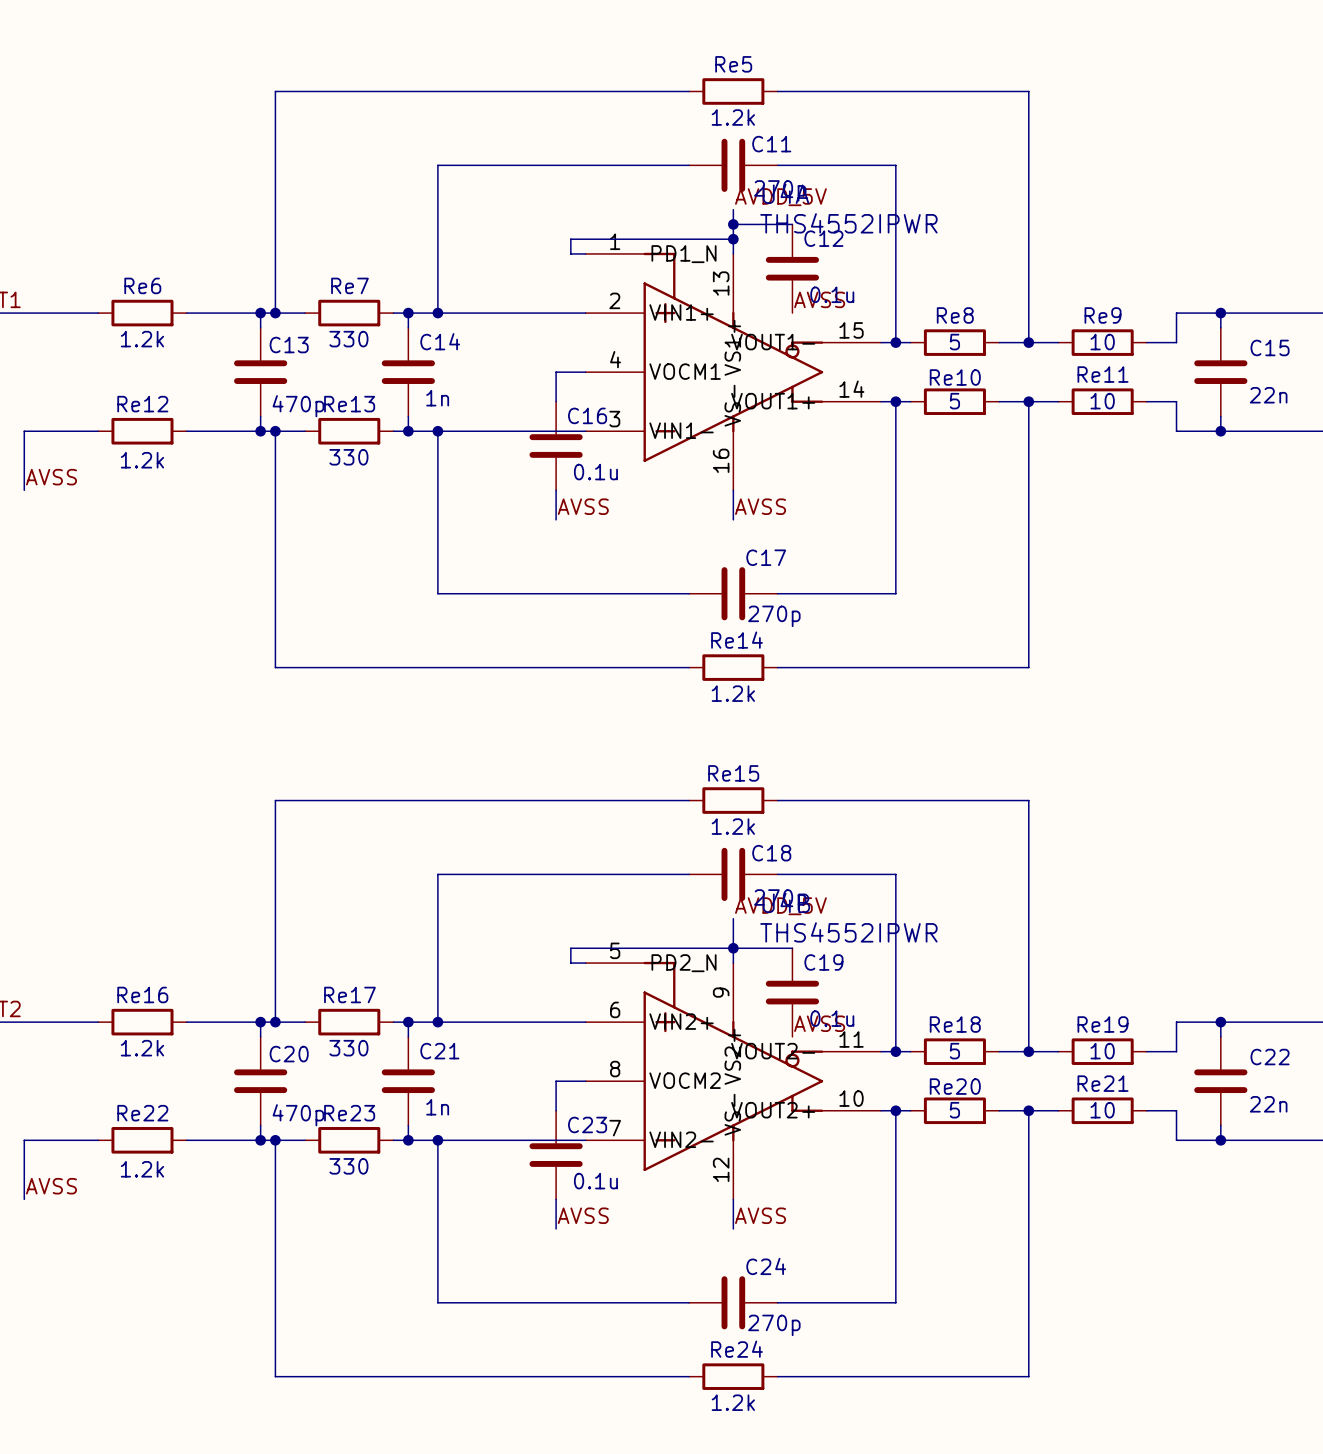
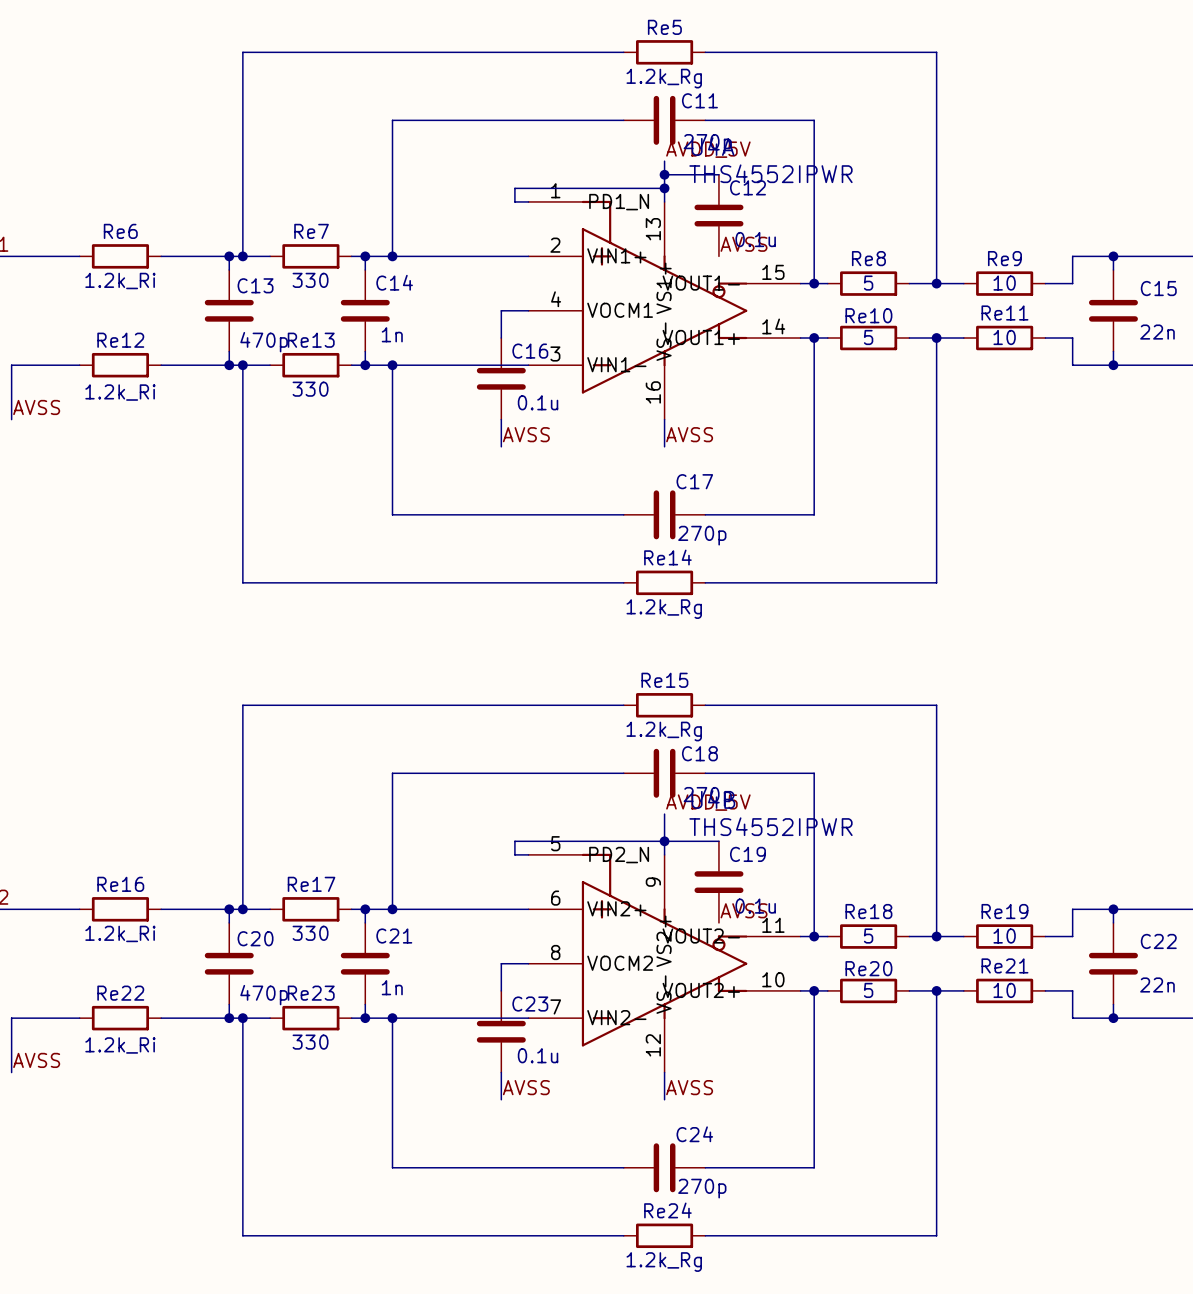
Re5 value: 1.2k (733, 117) -> 1.2k_Rg (664, 78)
Re6 value: 1.2k (142, 339) -> 1.2k_Ri (120, 281)
Re12 value: 1.2k (142, 460) -> 1.2k_Ri (120, 392)
Re14 value: 1.2k (733, 693) -> 1.2k_Rg (664, 609)
Re15 value: 1.2k (733, 826) -> 1.2k_Rg (664, 731)
Re16 value: 1.2k (142, 1048) -> 1.2k_Ri (120, 933)
Re22 value: 1.2k (142, 1169) -> 1.2k_Ri (120, 1045)
Re24 value: 1.2k (733, 1402) -> 1.2k_Rg (664, 1262)

